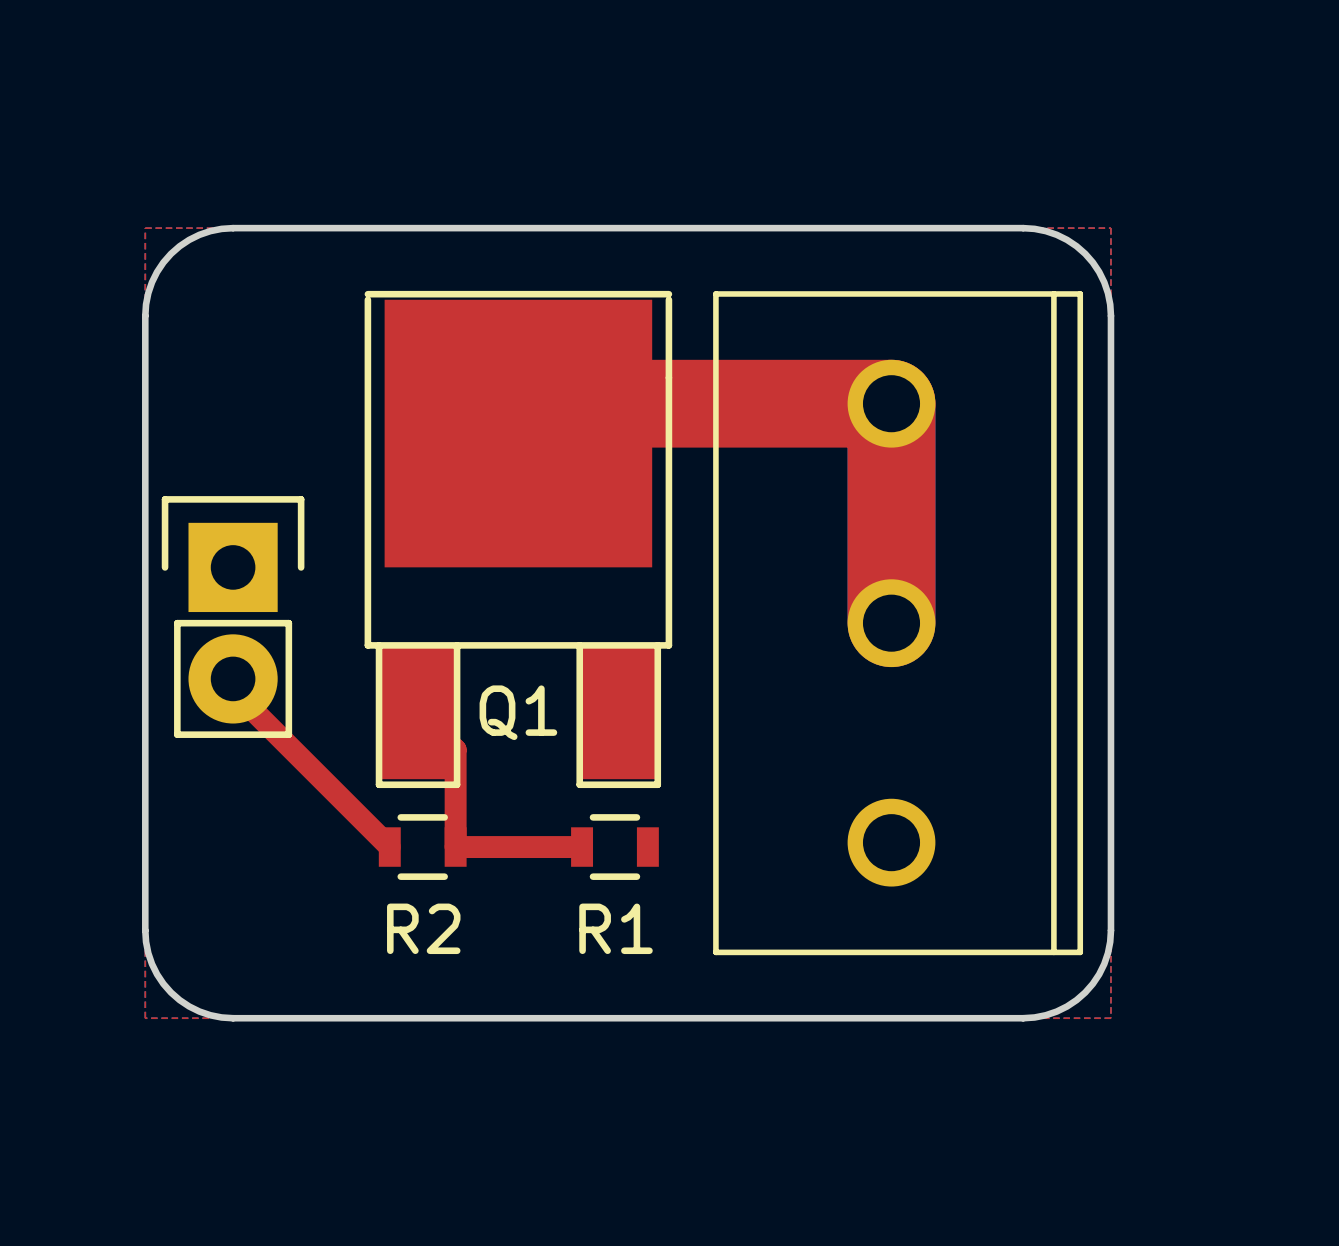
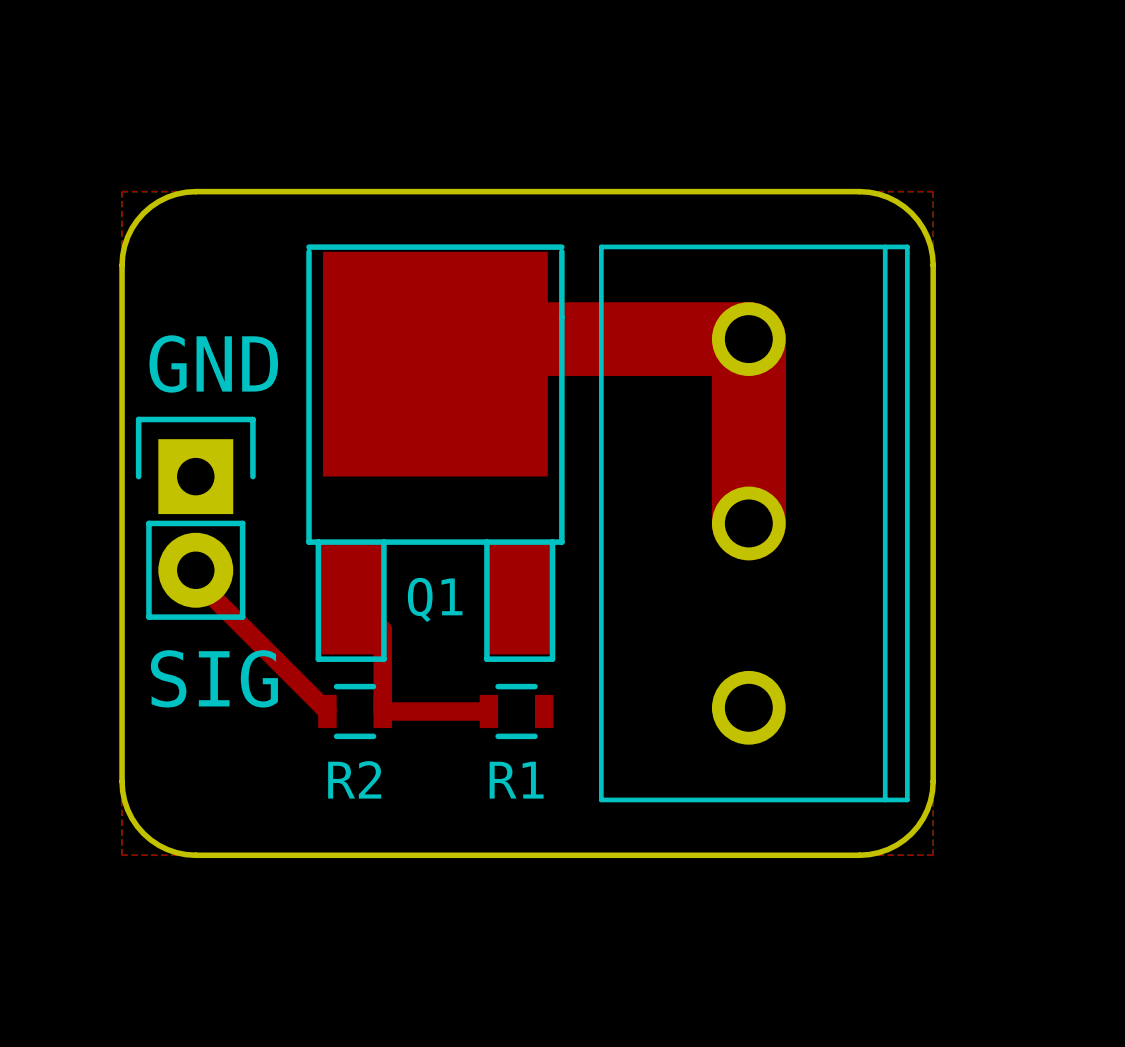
text: none -> GND (213, 363)
text: none -> SIG (214, 678)

